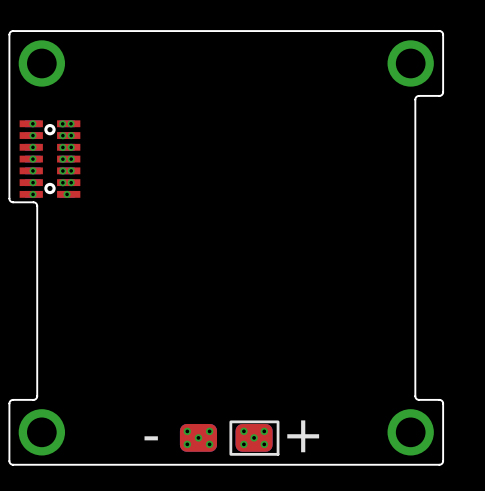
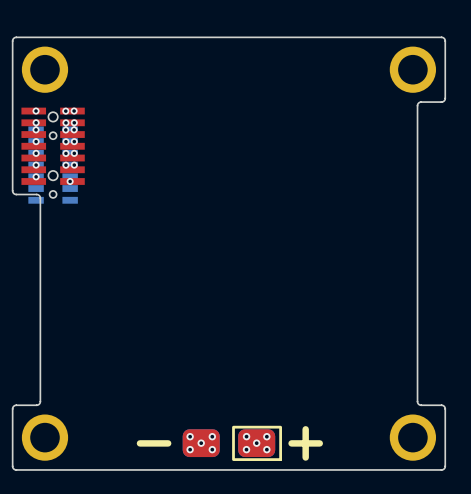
via: none -> (36, 111)
via: none -> (65, 111)
via: none -> (74, 111)
via: none -> (36, 122)
via: none -> (65, 122)
via: none -> (74, 122)
part: none -> (53, 146)
part: (49, 159) -> none
via: (62, 170) -> none
via: (71, 170) -> none
via: none -> (70, 181)
via: (33, 182) -> none
via: (62, 182) -> none
via: (71, 182) -> none
board edge: (9, 184) (10, 201) (34, 202) (37, 206) -> (12, 190) (15, 194) (38, 195) (40, 211)
via: (33, 194) -> none
via: (67, 194) -> none

